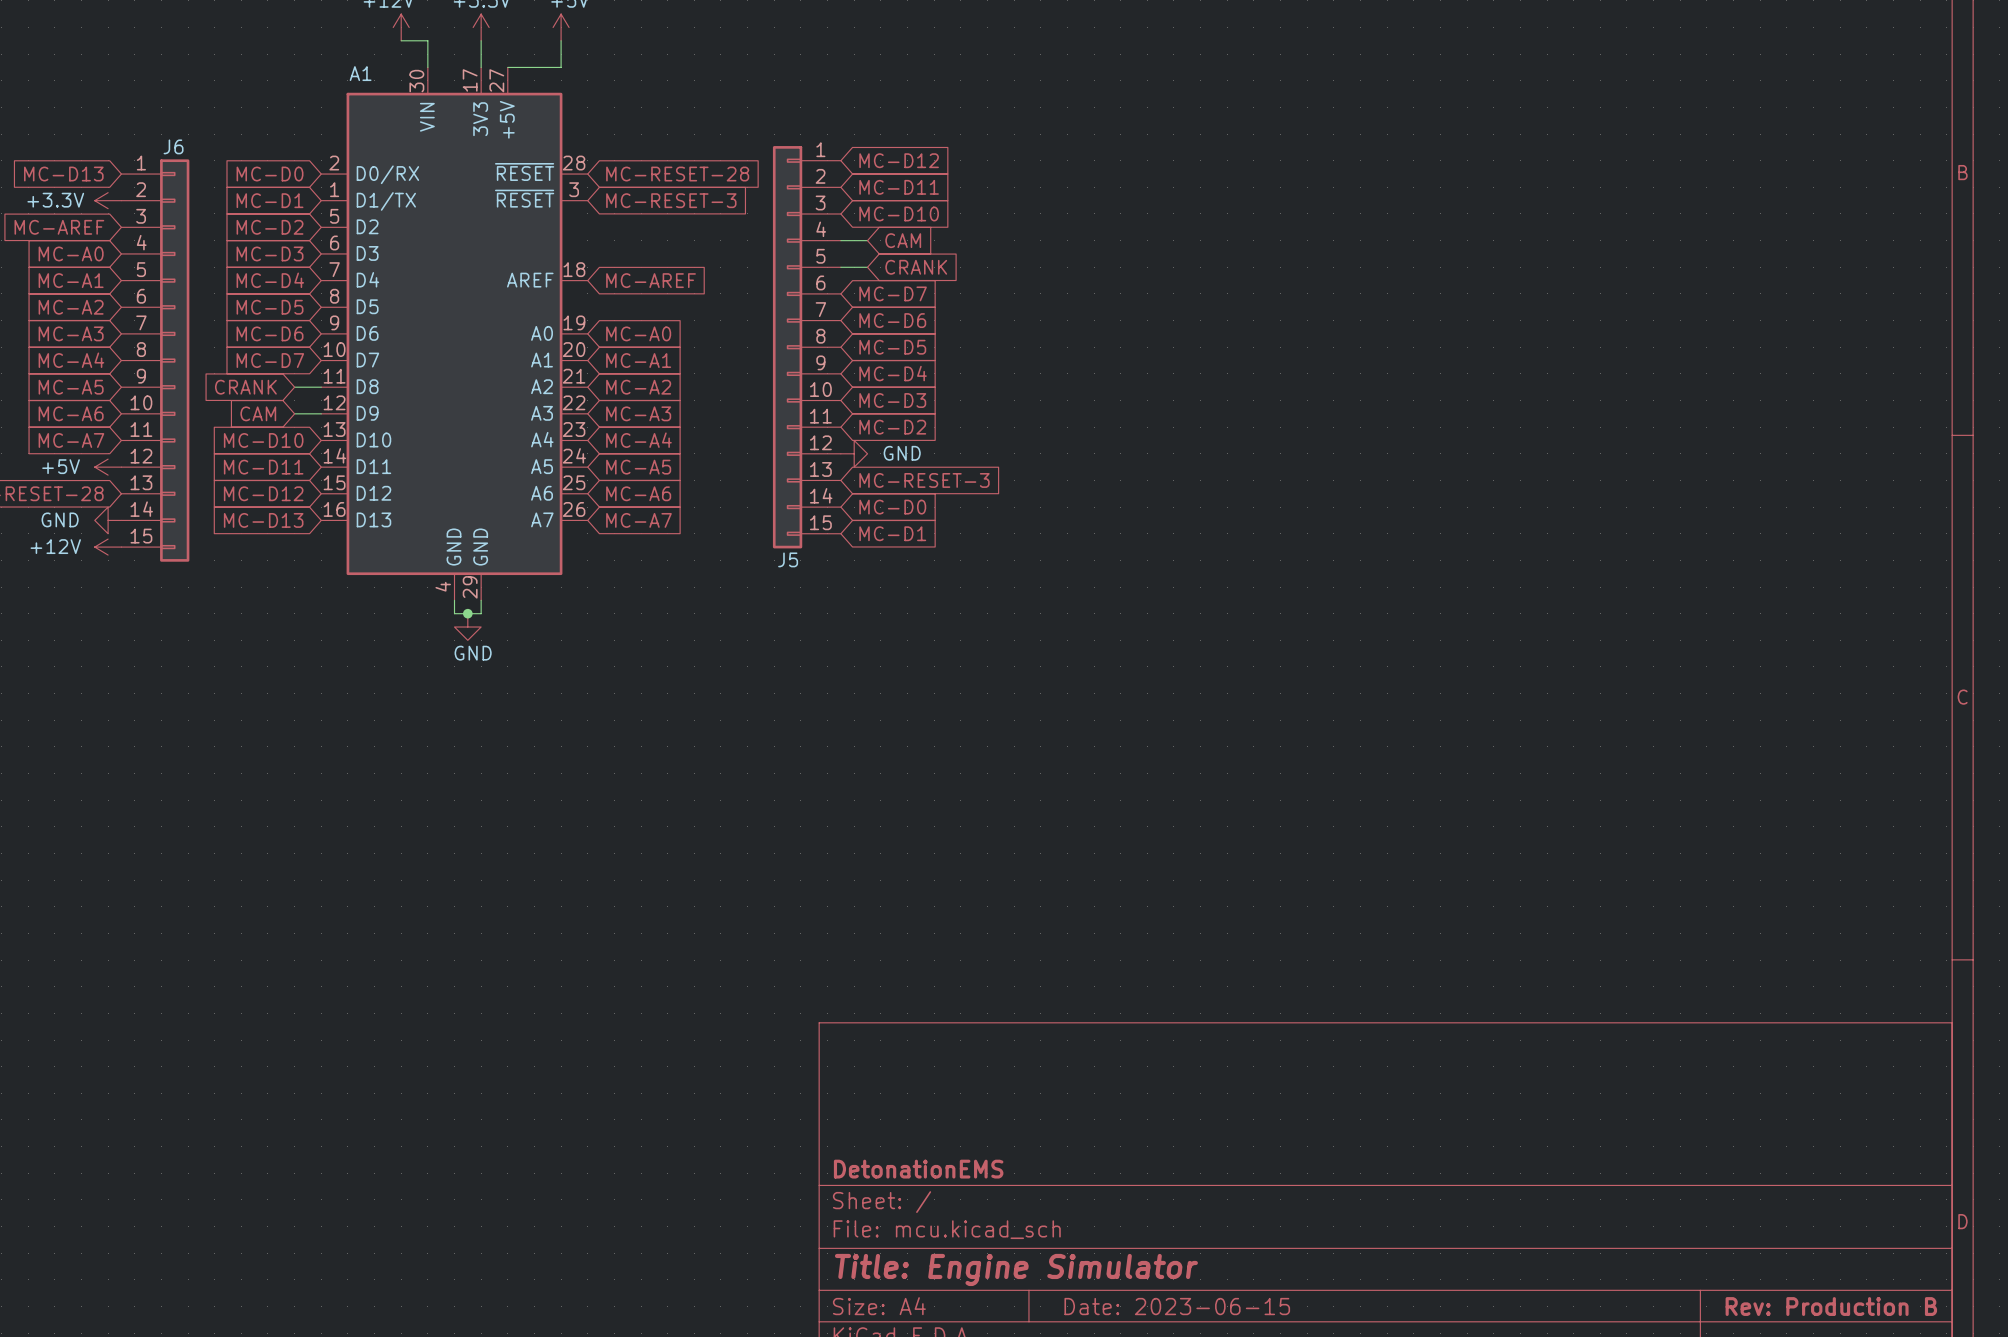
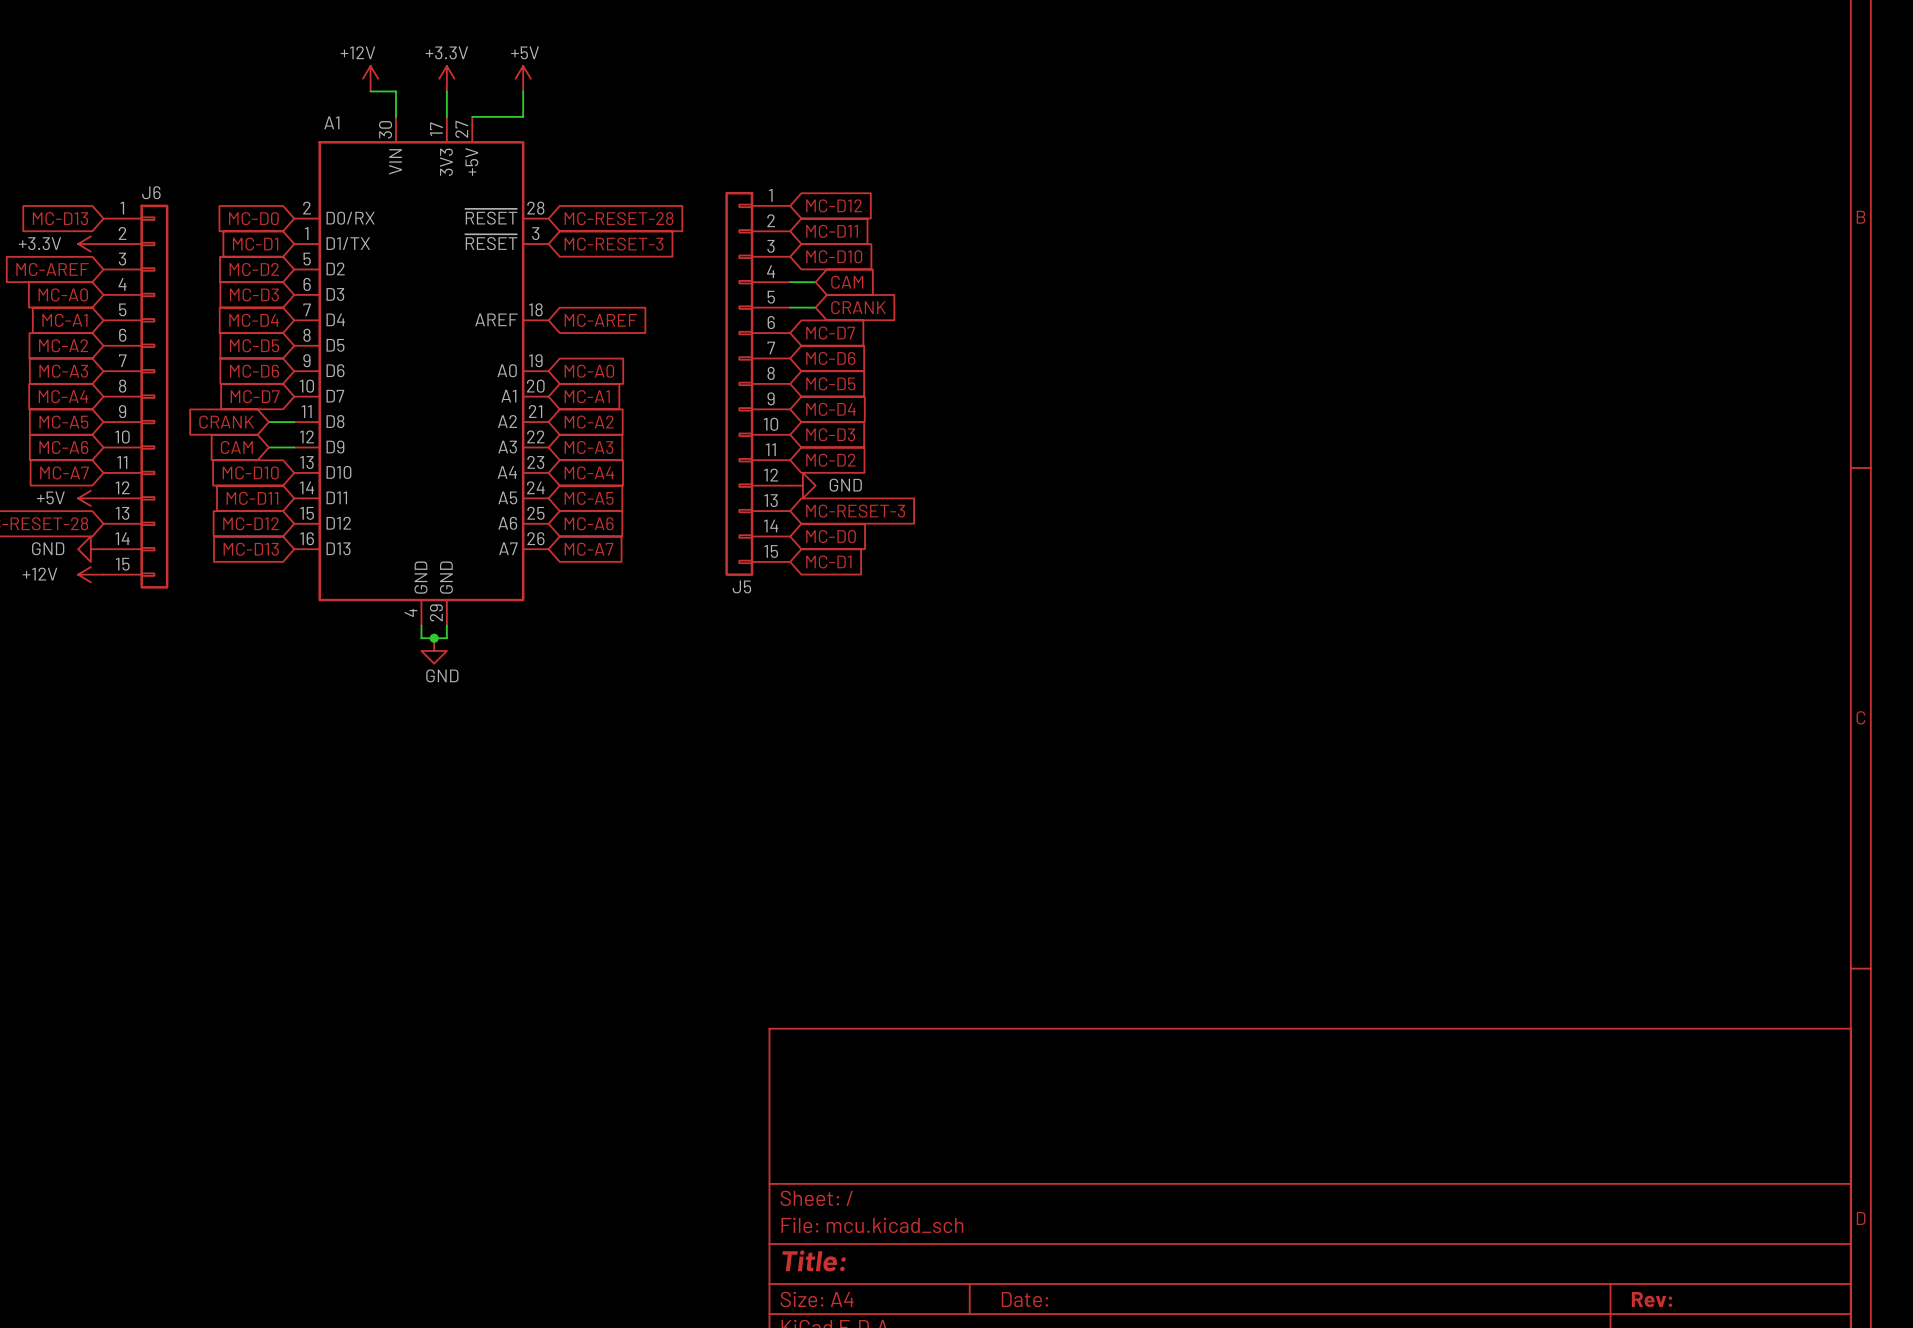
title block: DetonationEMS (918, 1169) -> none
title block: Title: Engine Simulator (1016, 1269) -> Title: (814, 1260)
title block: Date: 2023-06-15 (1177, 1306) -> Date: (1024, 1299)
title block: Rev: Production B (1831, 1306) -> Rev: (1651, 1299)

